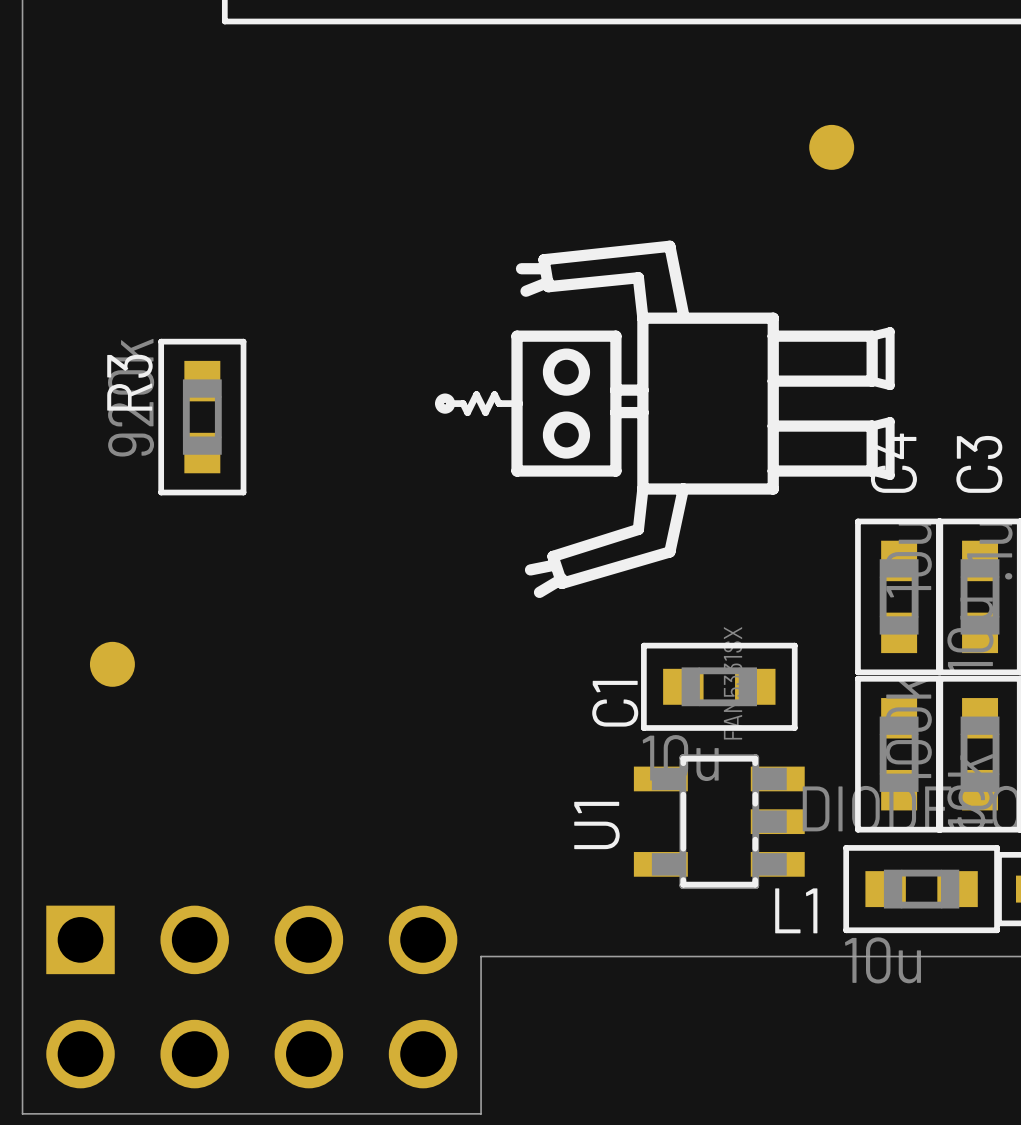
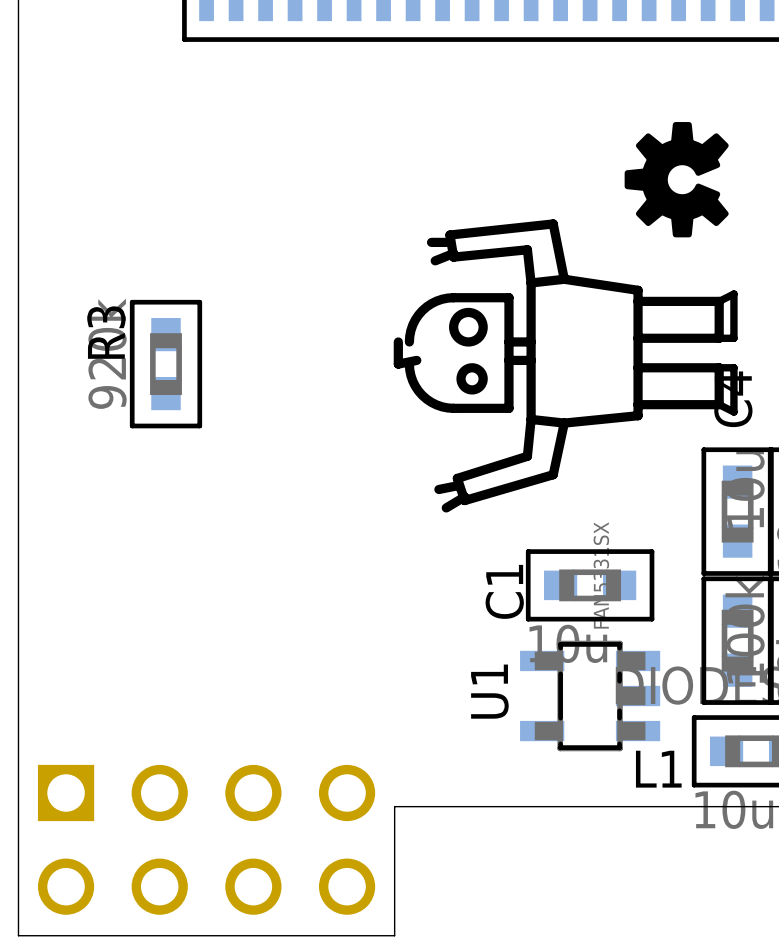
drawing: none -> [624, 122, 729, 238]
part: (831, 147) -> none
drawing shape: [434, 240, 895, 599] -> [393, 219, 738, 513]
part: (112, 664) -> none

